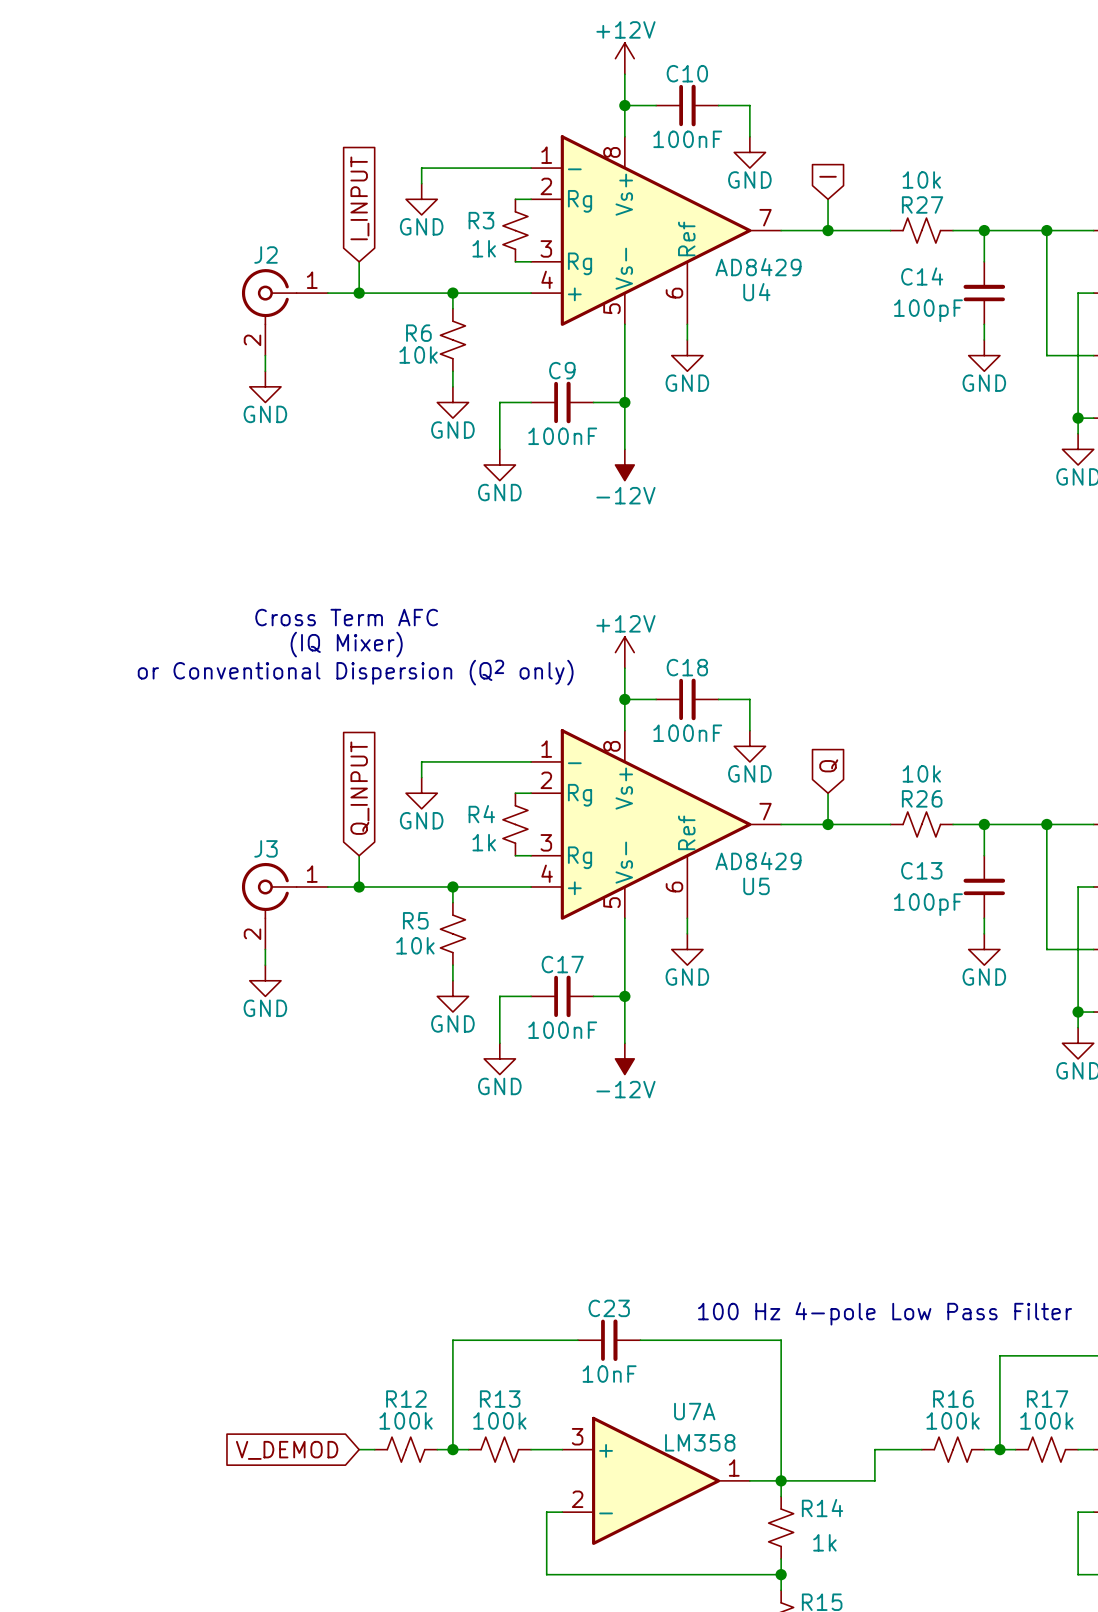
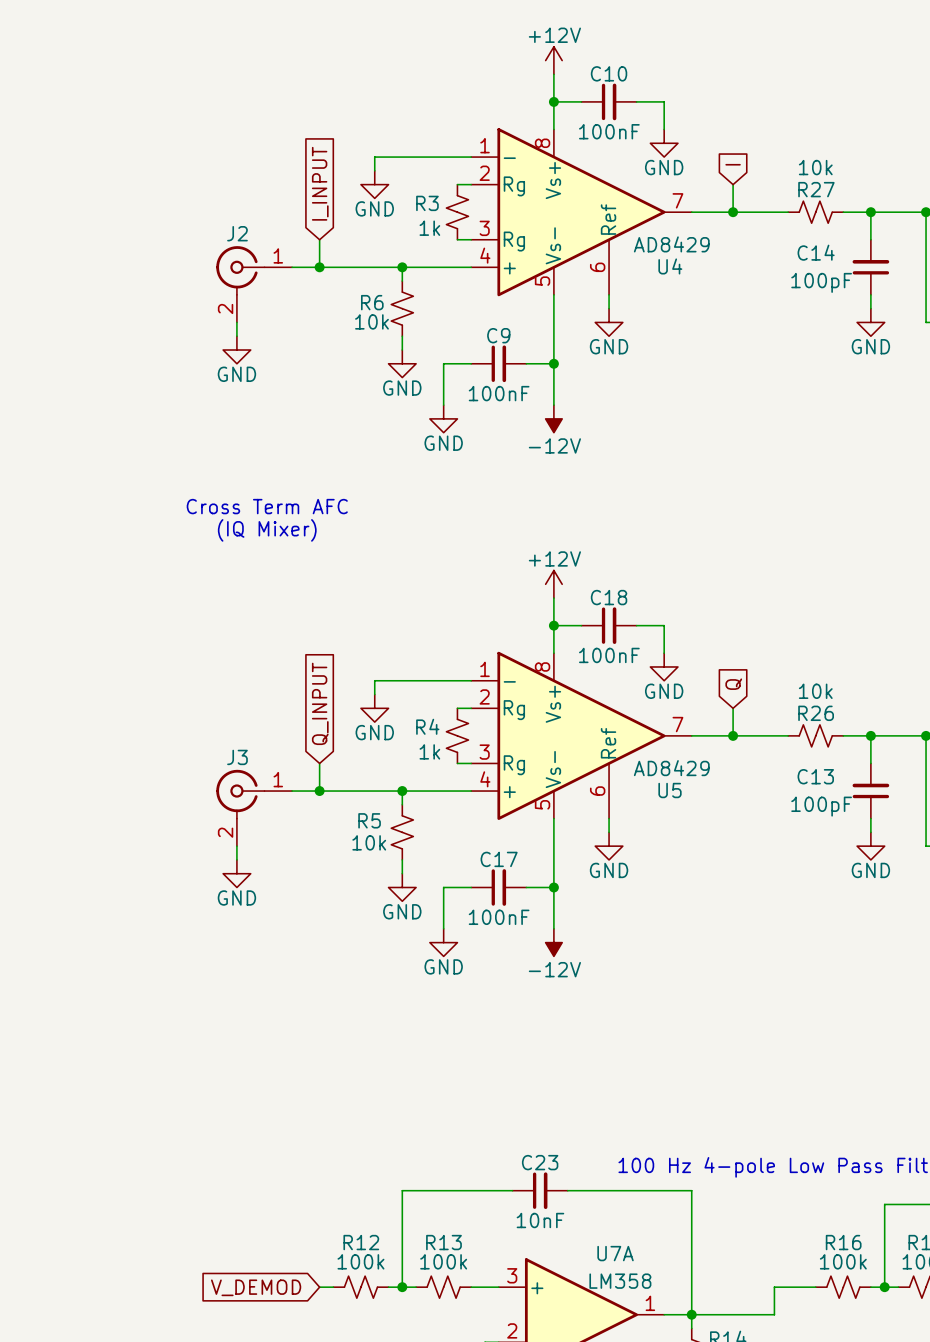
text position: Cross Term AFC (346, 617) -> Cross Term AFC (267, 506)
text position: (IQ Mixer) (346, 644) -> (IQ Mixer) (267, 530)
text: or Conventional Dispersion (Q2 only) (355, 672) -> none

